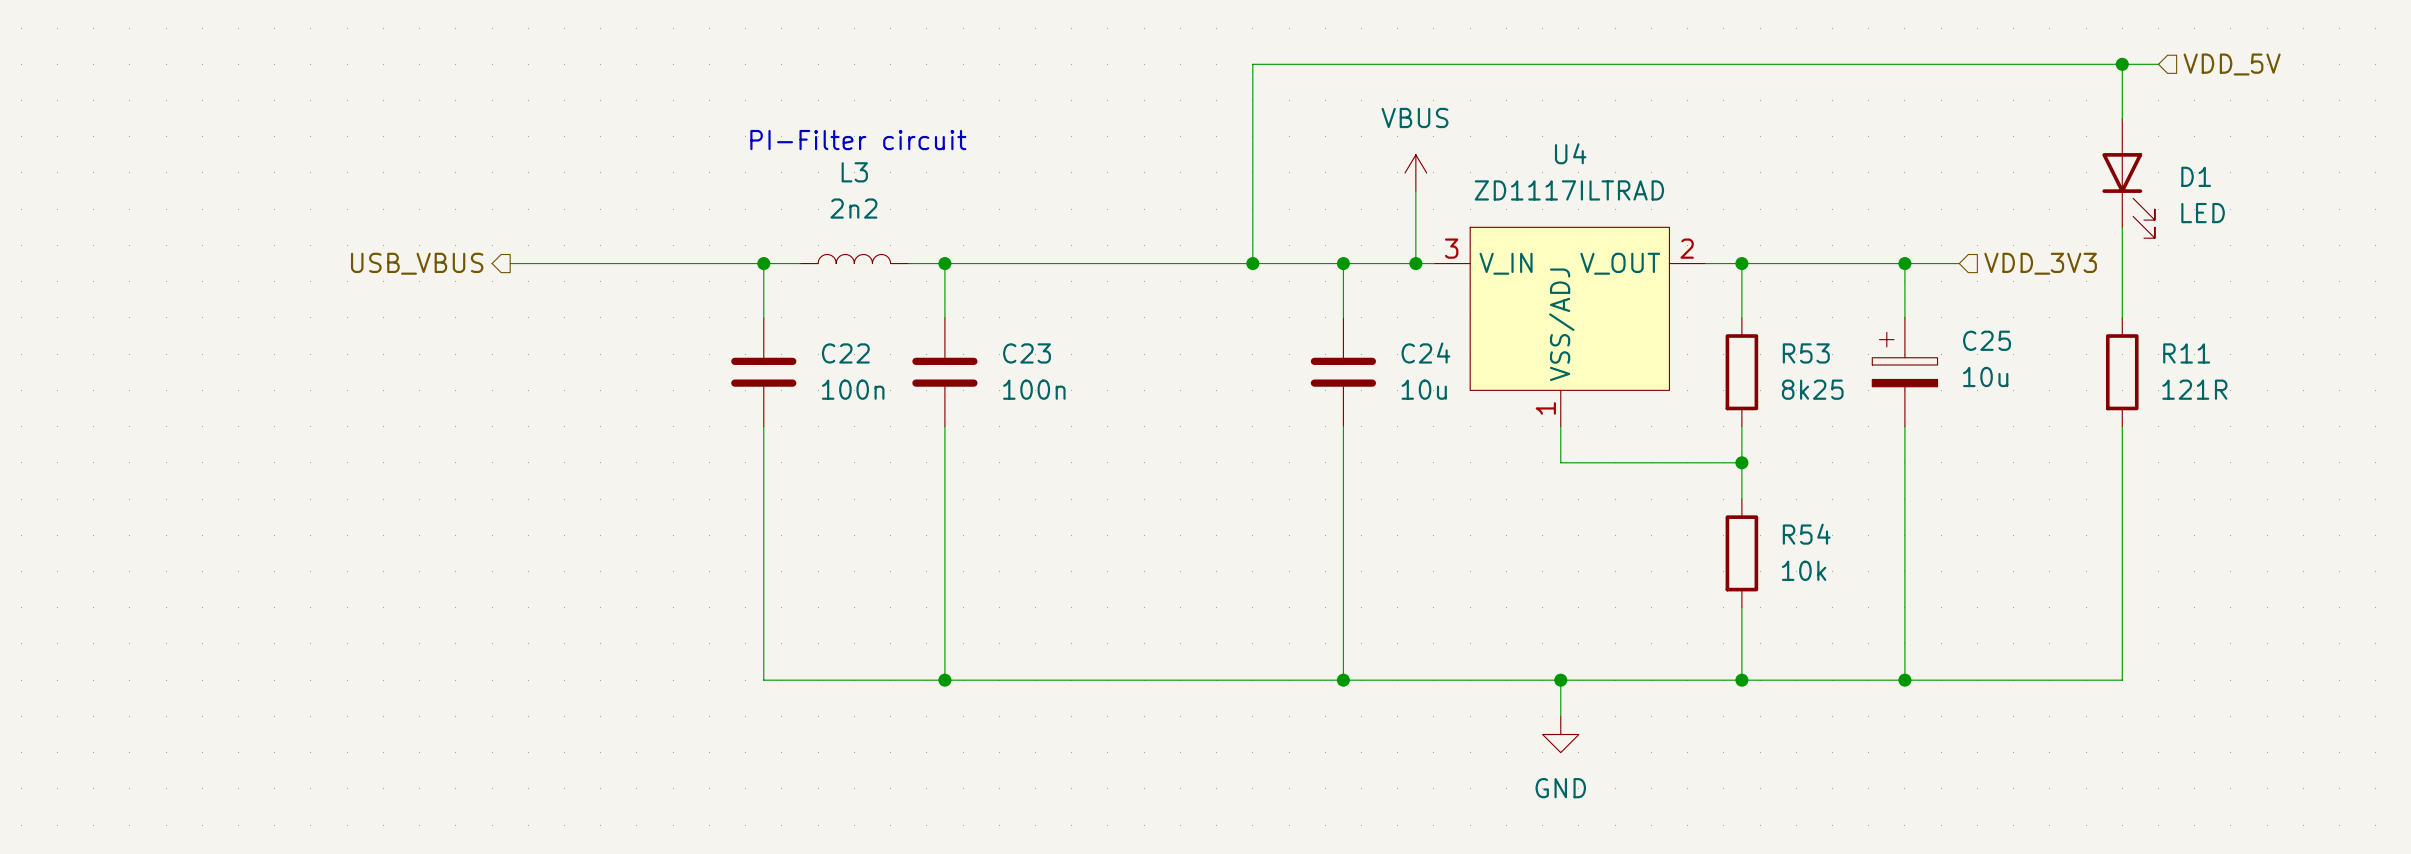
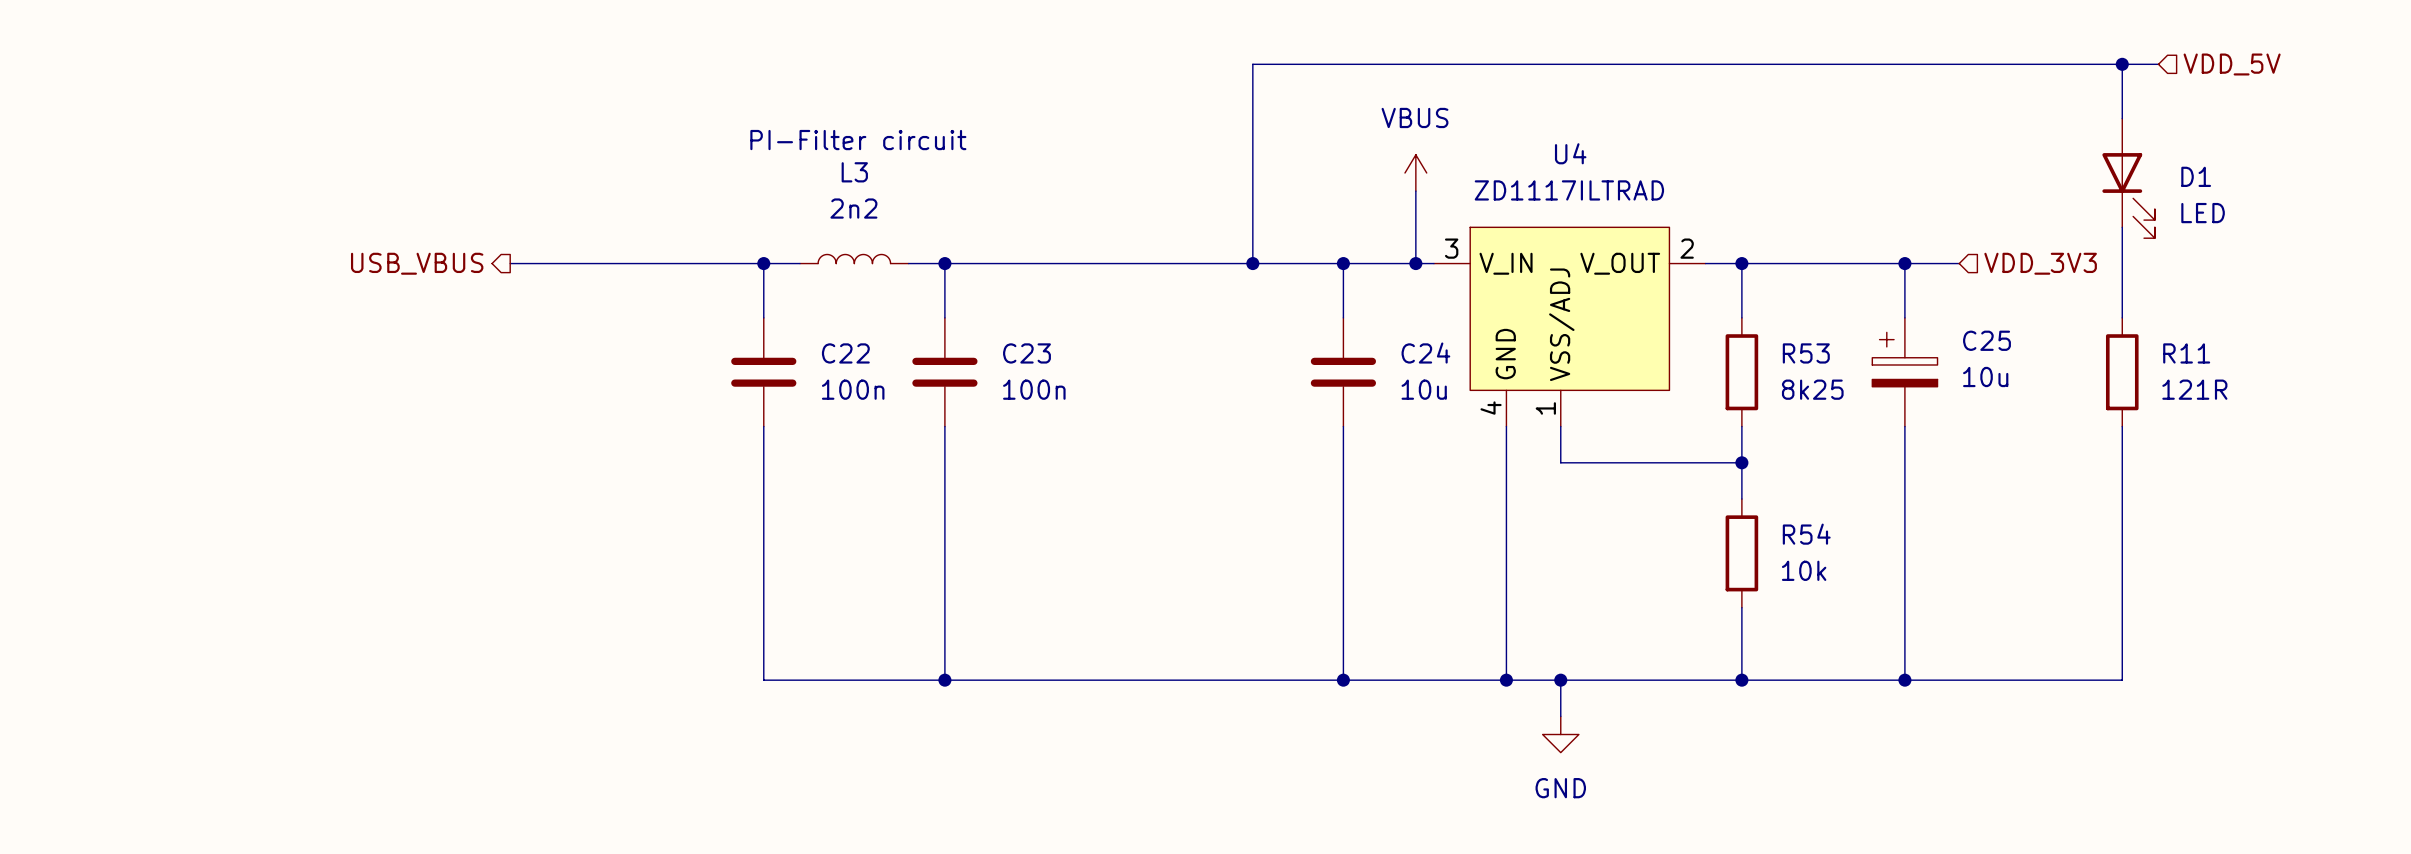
U4 symbol: [1433, 227, 1706, 427] -> [1433, 227, 1706, 427]
wire: none -> (1506, 426) (1506, 680)
junction: none -> (1506, 680)

